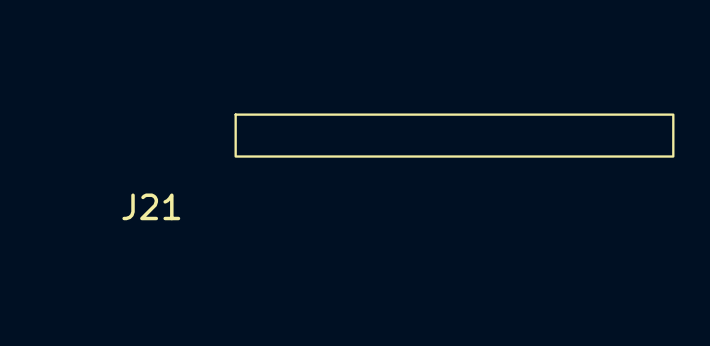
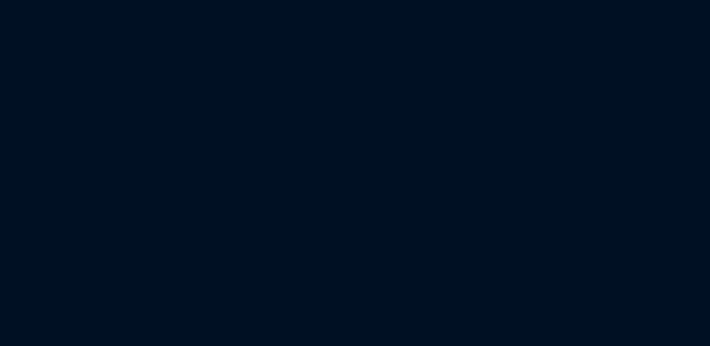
J21: (454, 135) -> none

